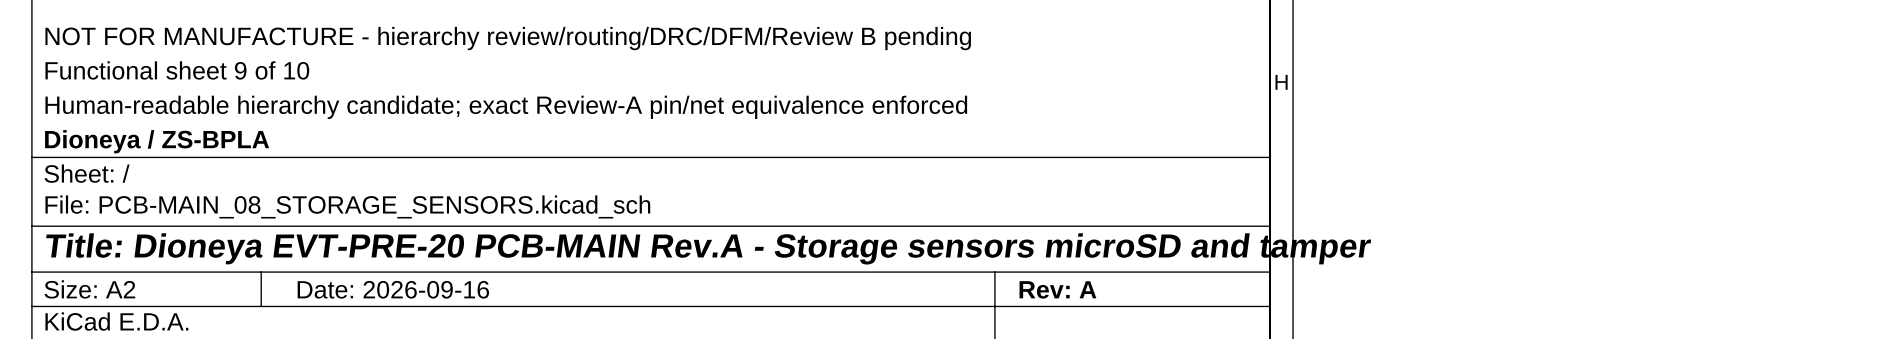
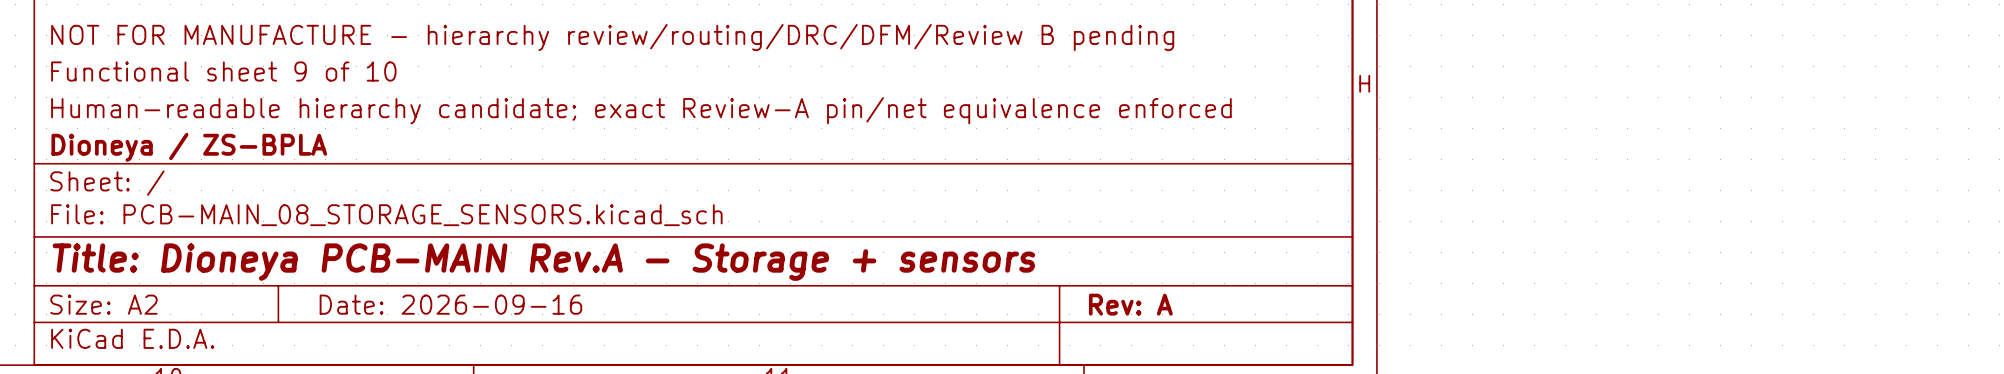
title block: Title: Dioneya EVT-PRE-20 PCB-MAIN Rev.A - Storage sensors microSD and tamper (708, 248) -> Title: Dioneya PCB-MAIN Rev.A - Storage + sensors (543, 262)

